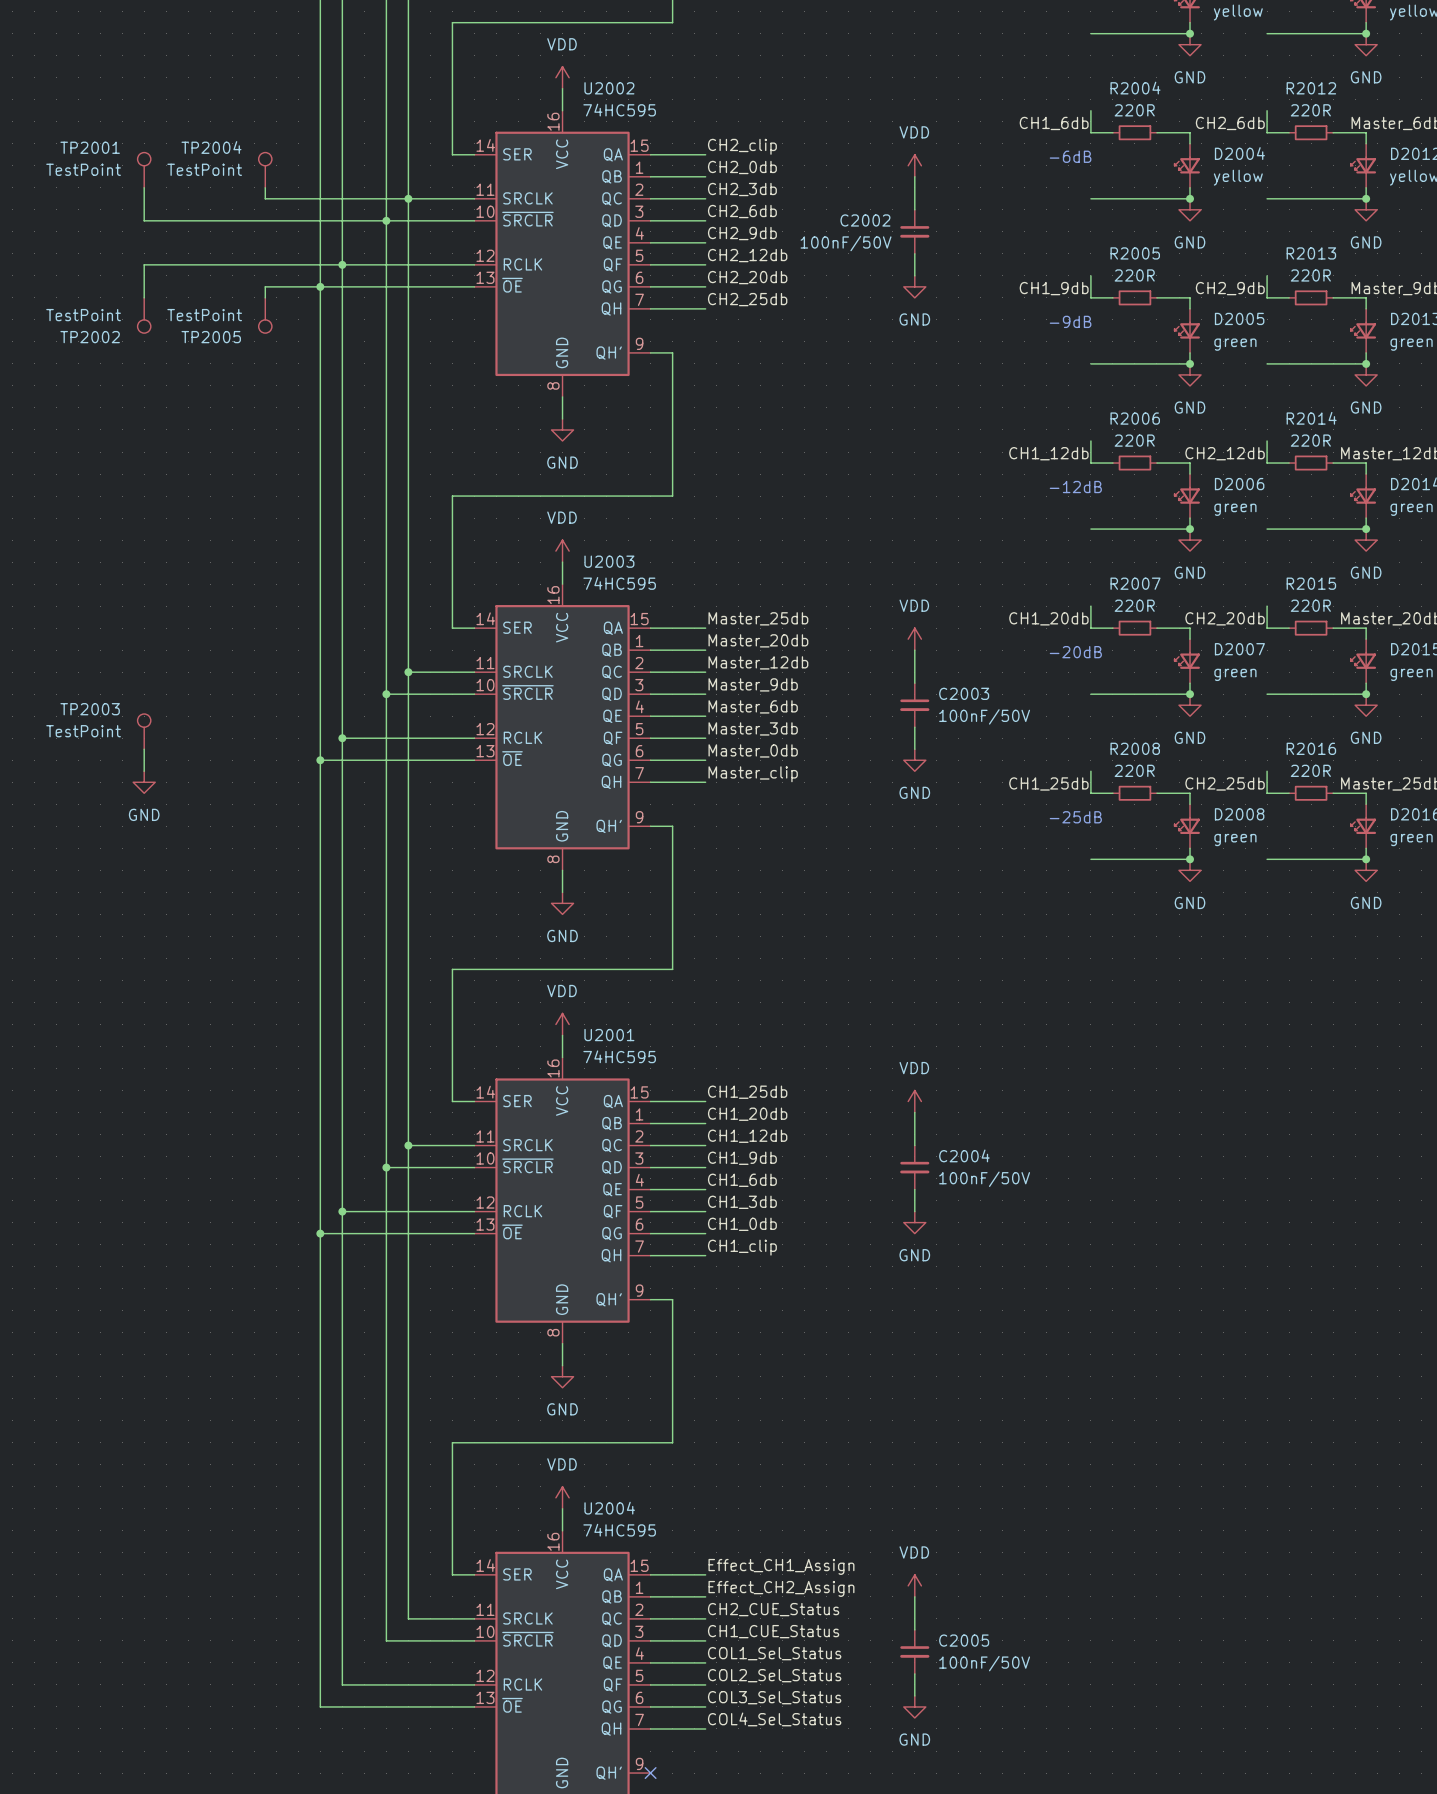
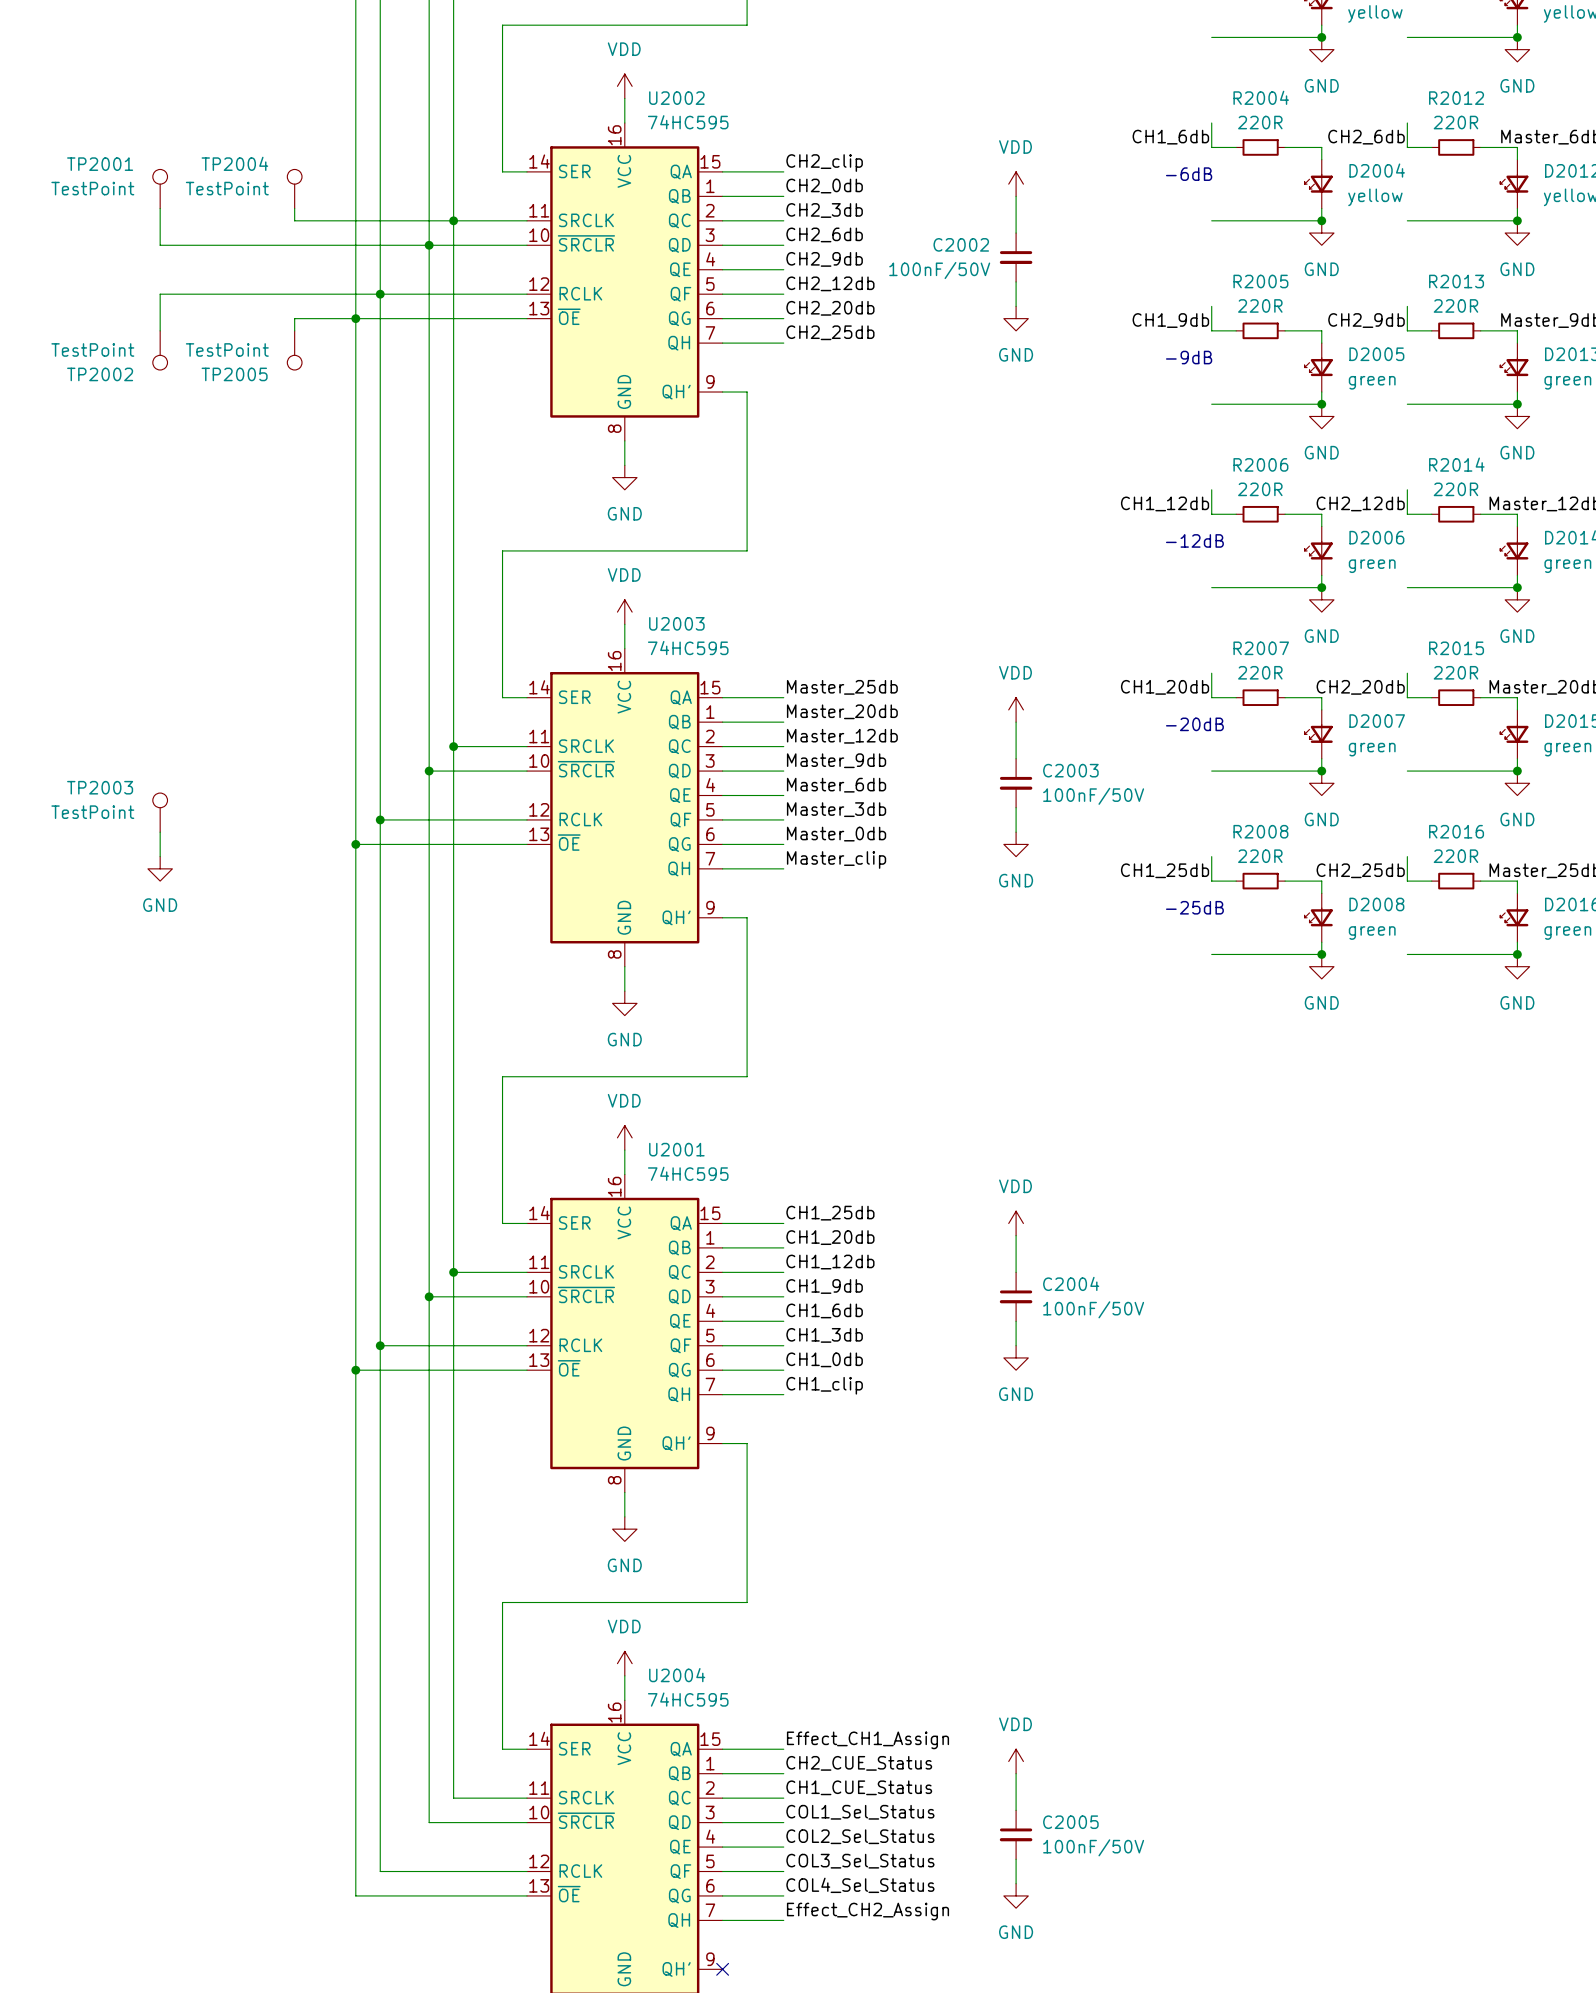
label: Effect_CH2_Assign (781, 1588) -> CH2_CUE_Status (859, 1763)
label: CH2_CUE_Status (773, 1609) -> CH1_CUE_Status (859, 1787)
label: CH1_CUE_Status (773, 1631) -> COL1_Sel_Status (860, 1812)
label: COL1_Sel_Status (774, 1653) -> COL2_Sel_Status (860, 1836)
label: COL2_Sel_Status (774, 1675) -> COL3_Sel_Status (860, 1861)
label: COL3_Sel_Status (774, 1697) -> COL4_Sel_Status (860, 1885)
label: COL4_Sel_Status (774, 1719) -> Effect_CH2_Assign (867, 1911)

